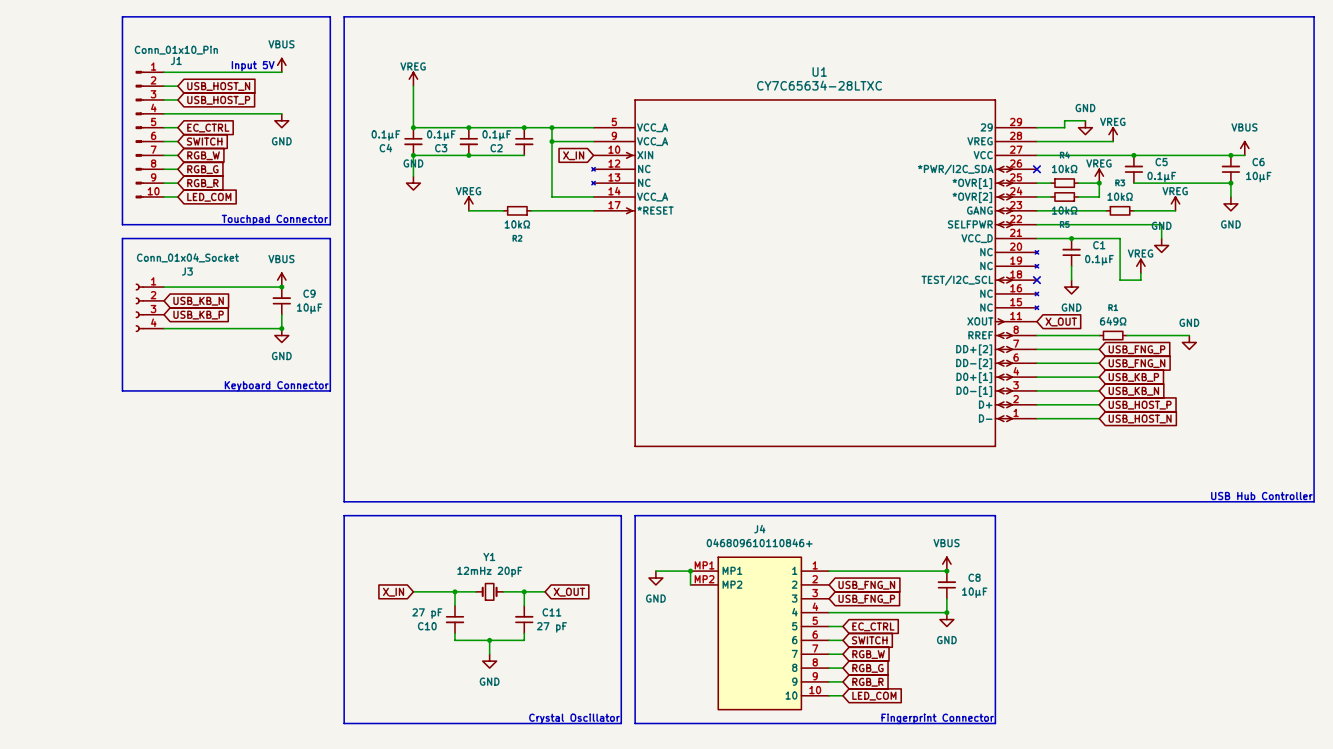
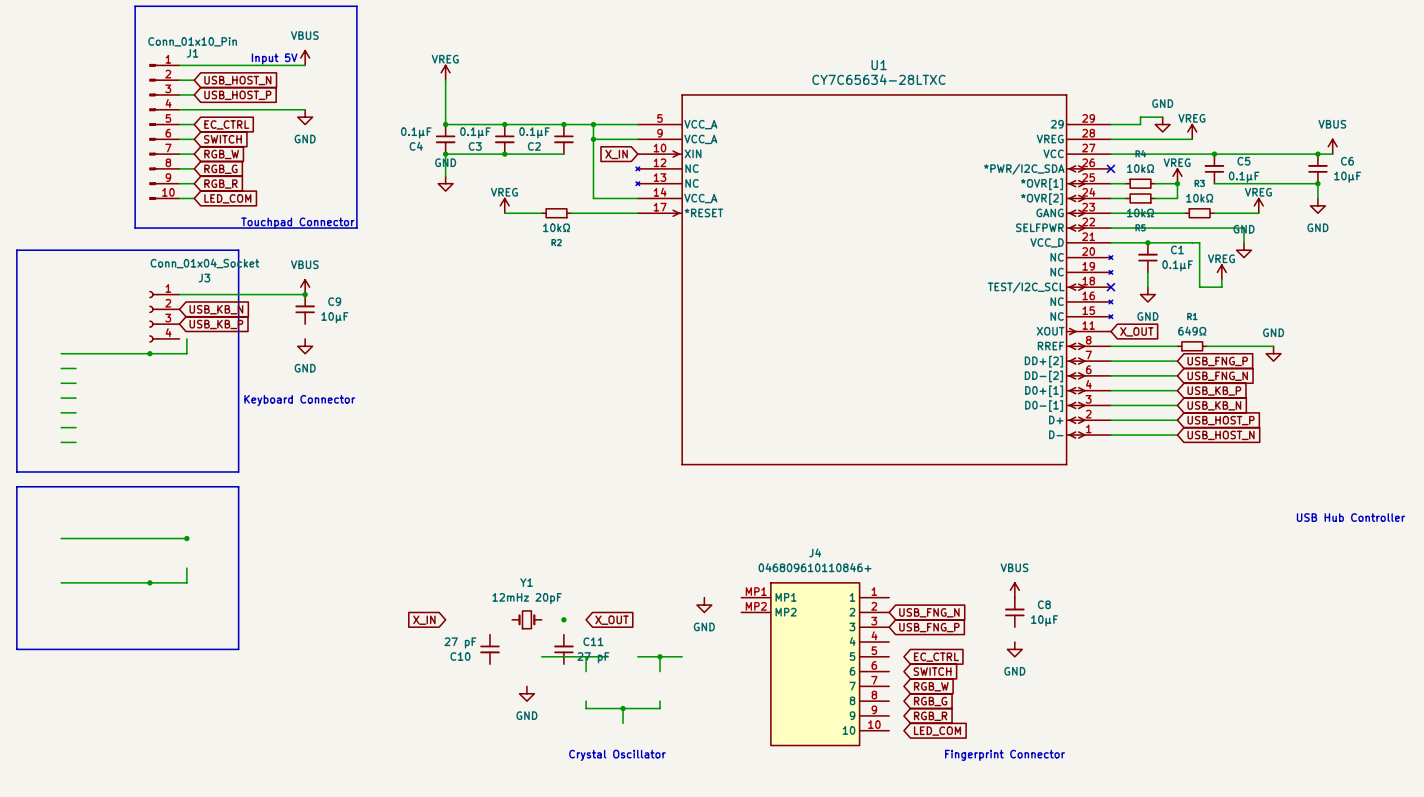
line: (344, 16) (344, 501) (1314, 501) (1314, 16) (344, 16) -> none
line: (122, 238) (122, 390) (330, 390) (330, 238) (122, 238) -> none
line: none -> (16, 250) (16, 471) (238, 471) (238, 250) (16, 250)
wire: (281, 314) (281, 328) (164, 328) -> (186, 338) (186, 353) (61, 353)
junction: (281, 328) -> none
junction: none -> (149, 353)
wire: none -> (61, 368) (76, 368)
wire: none -> (61, 383) (76, 383)
wire: none -> (61, 398) (76, 398)
wire: none -> (61, 412) (76, 412)
wire: none -> (61, 427) (76, 427)
wire: none -> (61, 442) (76, 442)
line: none -> (16, 486) (238, 486) (238, 649) (16, 649) (16, 486)
wire: none -> (61, 538) (186, 538)
junction: none -> (186, 538)
line: (344, 515) (621, 515) (621, 723) (344, 723) (344, 515) -> none
line: (635, 515) (995, 515) (995, 723) (635, 723) (635, 515) -> none
wire: none -> (186, 568) (186, 582) (61, 582)
junction: none -> (149, 582)
wire: (655, 571) (690, 571) (690, 584) -> none
junction: (690, 571) -> none
wire: (829, 571) (946, 571) -> none
junction: (946, 571) -> none
wire: (413, 591) (475, 591) -> (541, 656) (608, 656)
wire: (455, 591) (455, 605) -> (586, 656) (586, 671)
junction: (455, 591) -> none
wire: (503, 591) (545, 591) -> (637, 656) (682, 656)
wire: (524, 591) (524, 605) -> (660, 656) (660, 671)
wire: (946, 598) (946, 612) (829, 612) -> none
junction: (946, 612) -> none
junction: none -> (660, 656)
wire: (829, 626) (842, 626) -> none
wire: (455, 633) (455, 640) (524, 640) (524, 633) -> (586, 701) (586, 708) (660, 708) (660, 701)
wire: (489, 640) (489, 654) -> (623, 708) (623, 723)
junction: (489, 640) -> none
wire: (829, 640) (842, 640) -> none
wire: (829, 654) (842, 654) -> none
wire: (829, 668) (842, 668) -> none
junction: none -> (623, 708)
wire: (829, 681) (842, 681) -> none
wire: (829, 695) (842, 695) -> none

